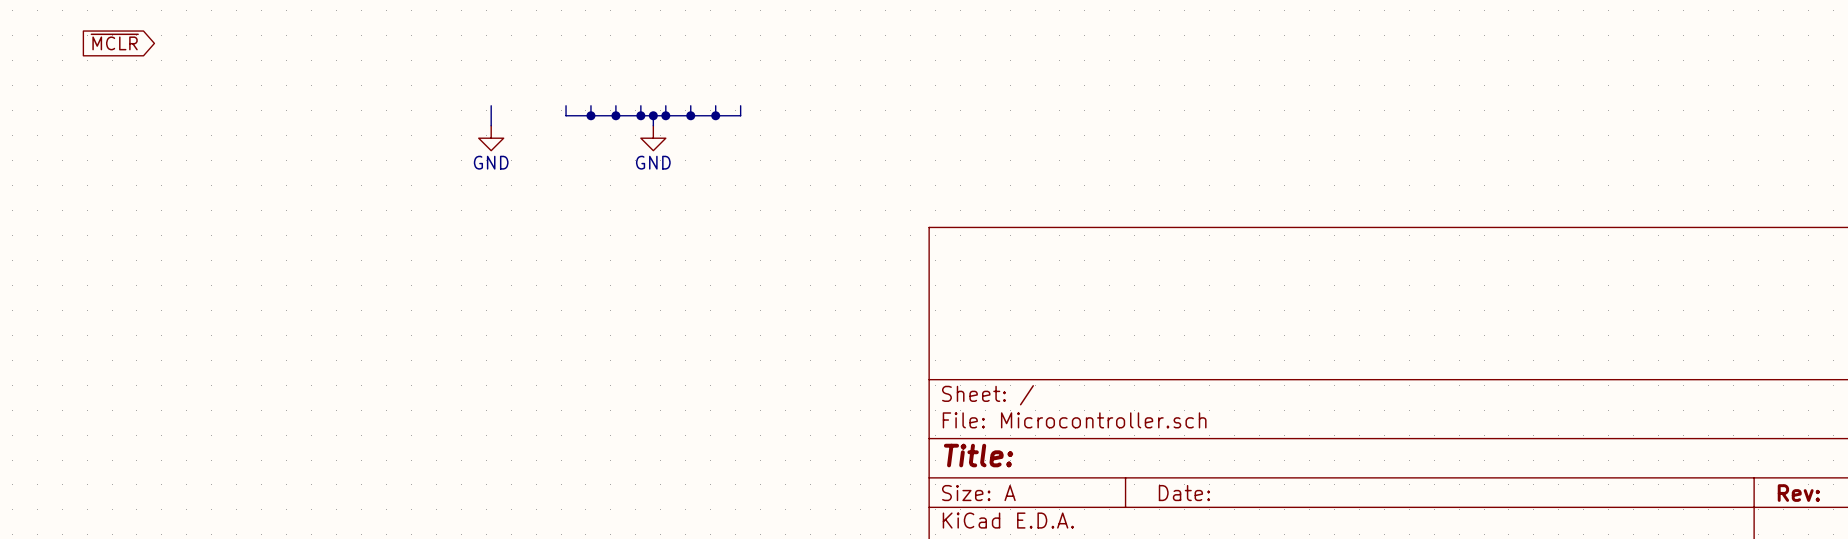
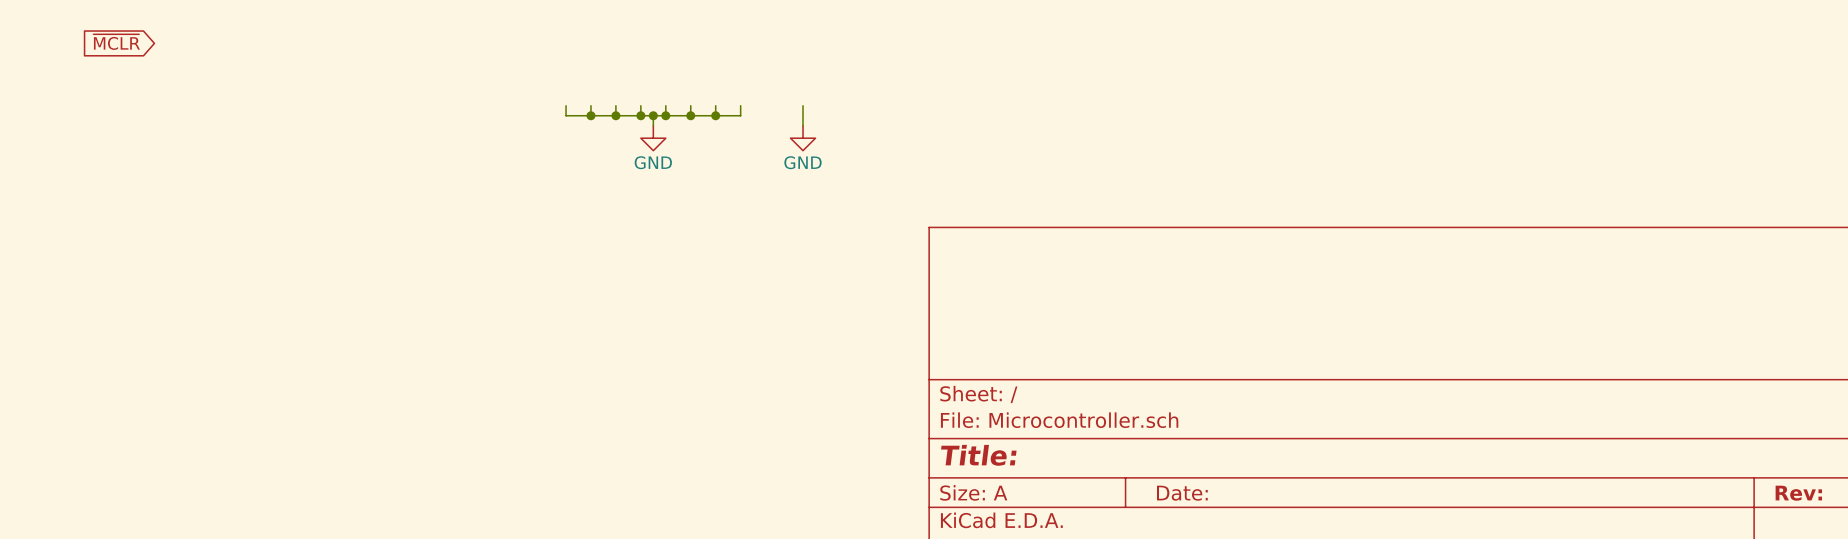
wire: (491, 105) (491, 125) -> none
wire: none -> (803, 105) (803, 125)
power symbol: GND (491, 138) -> none
power symbol: none -> GND (803, 138)

